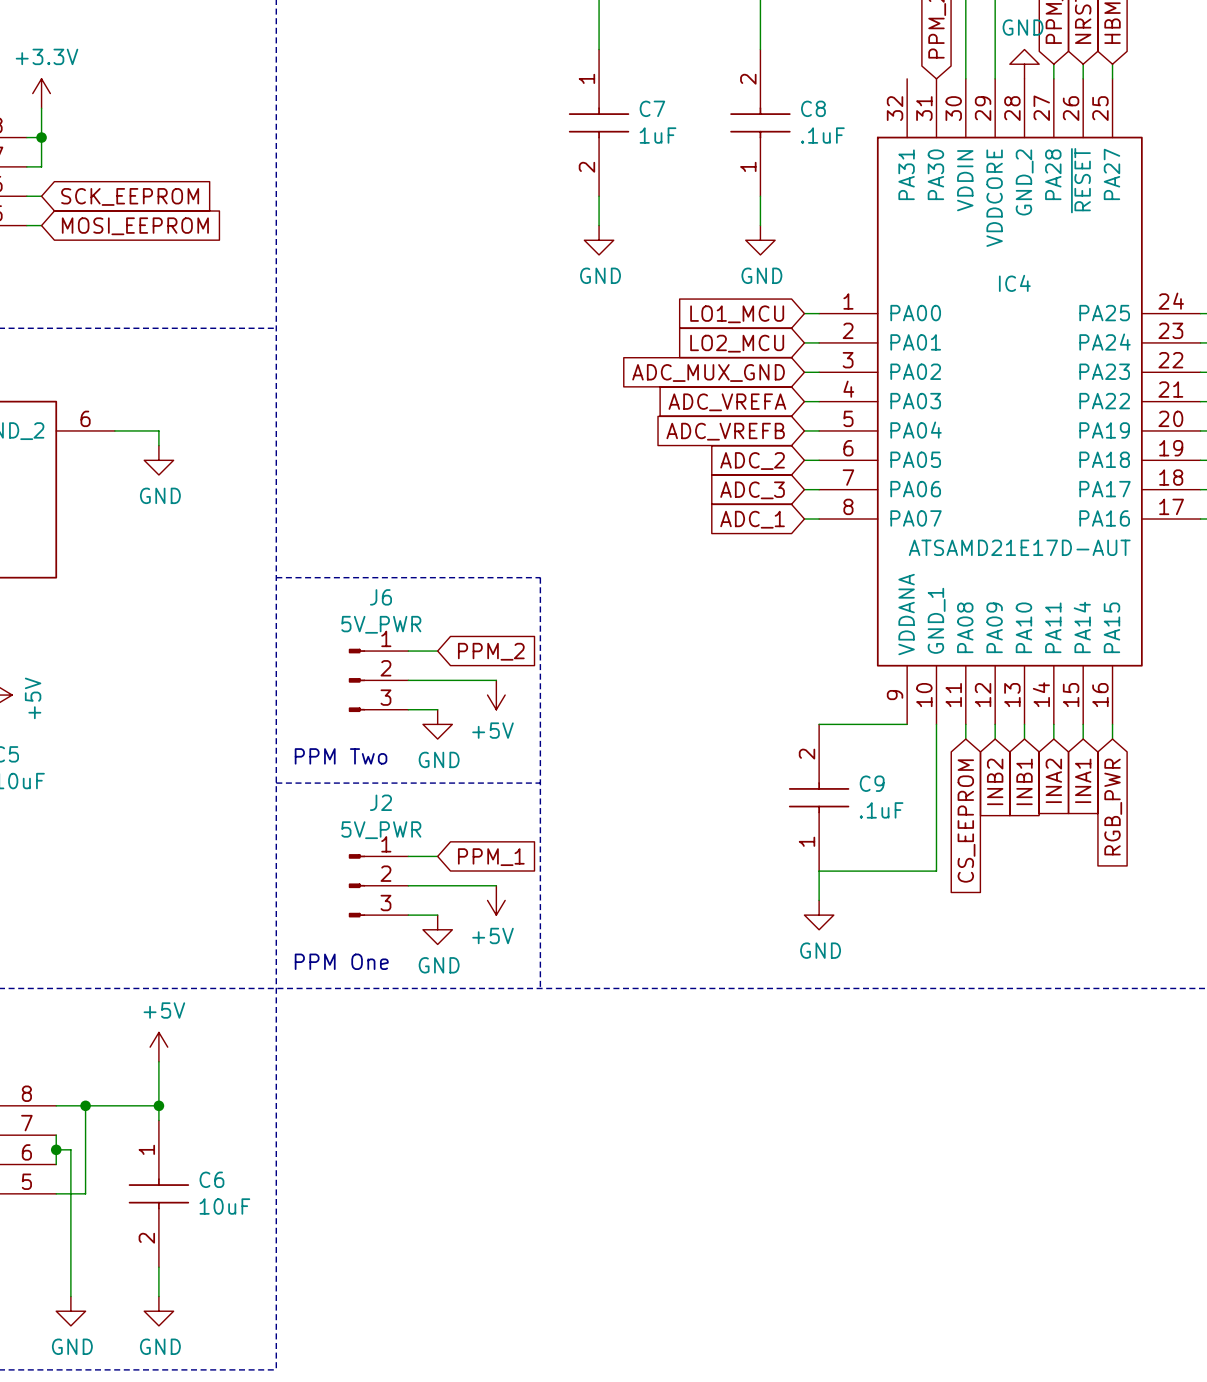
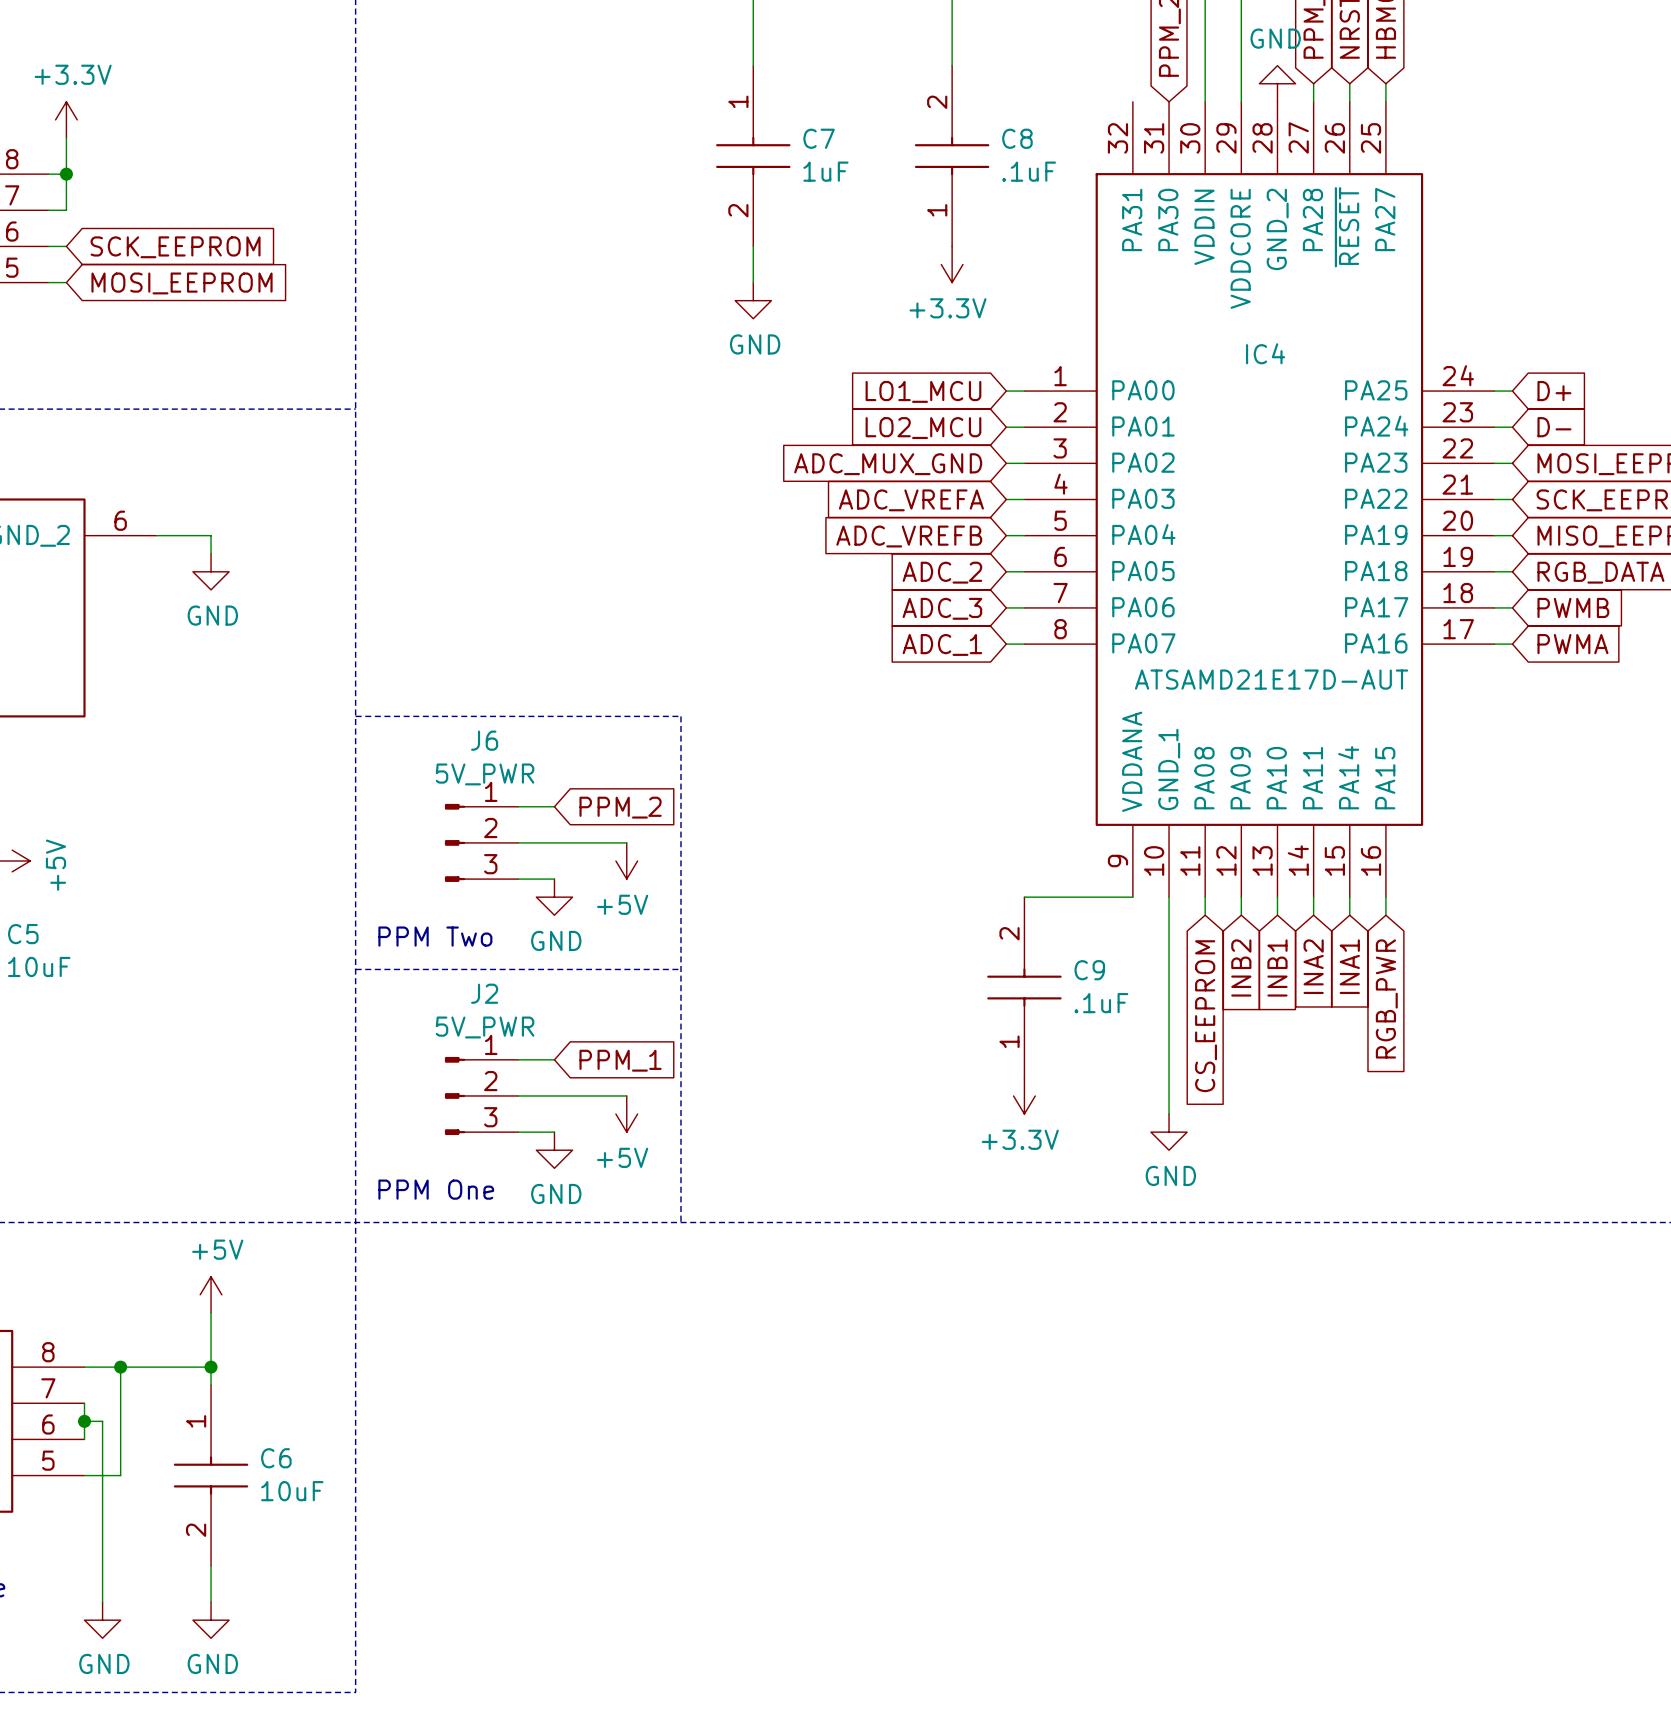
power symbol: none -> +3.3V (952, 264)
power symbol: GND (760, 240) -> none
wire: (936, 871) (819, 871) (819, 900) -> (1169, 1077) (1169, 1114)
power symbol: none -> +3.3V (1024, 1095)
power symbol position: GND (819, 915) -> GND (1169, 1132)

